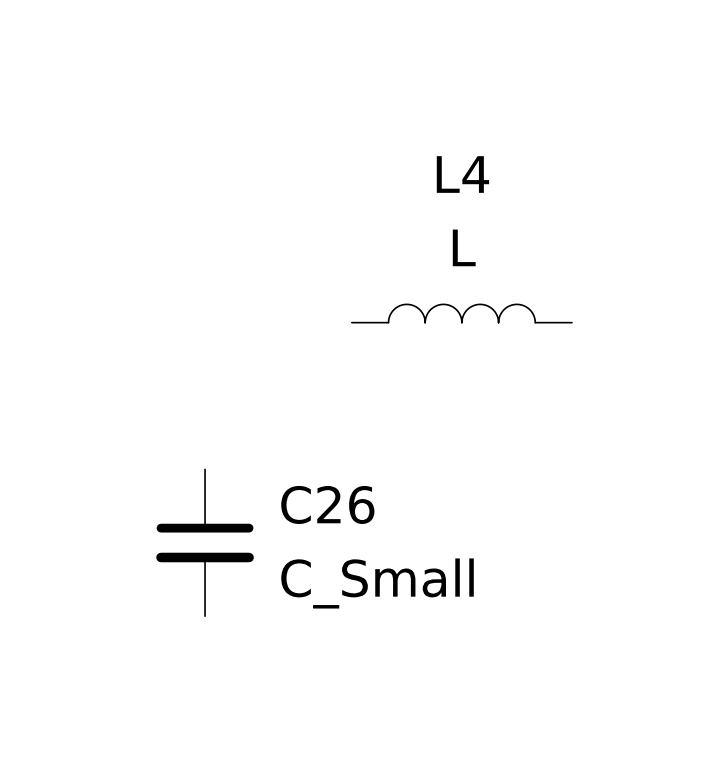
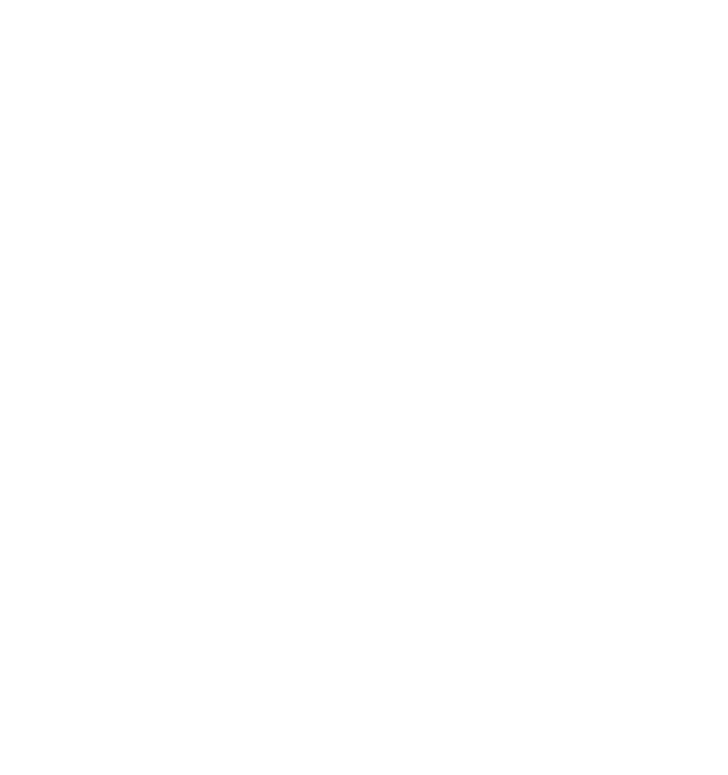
L4: L (461, 313) -> none
C26: C_Small (205, 542) -> none

